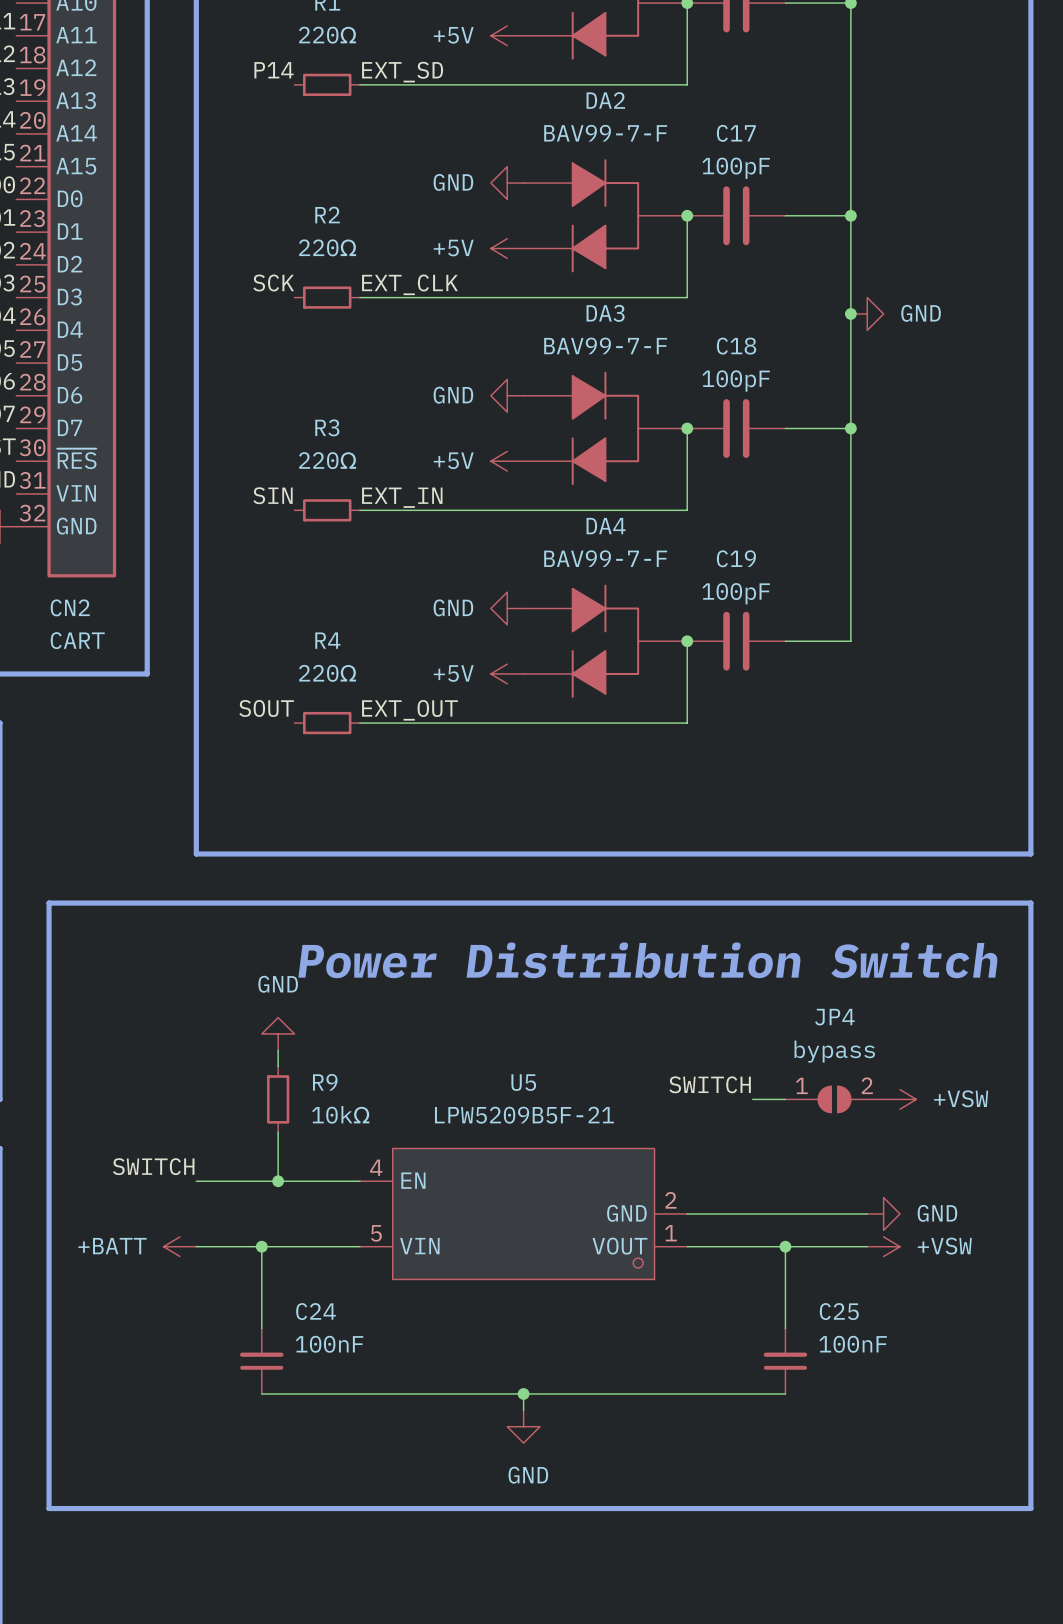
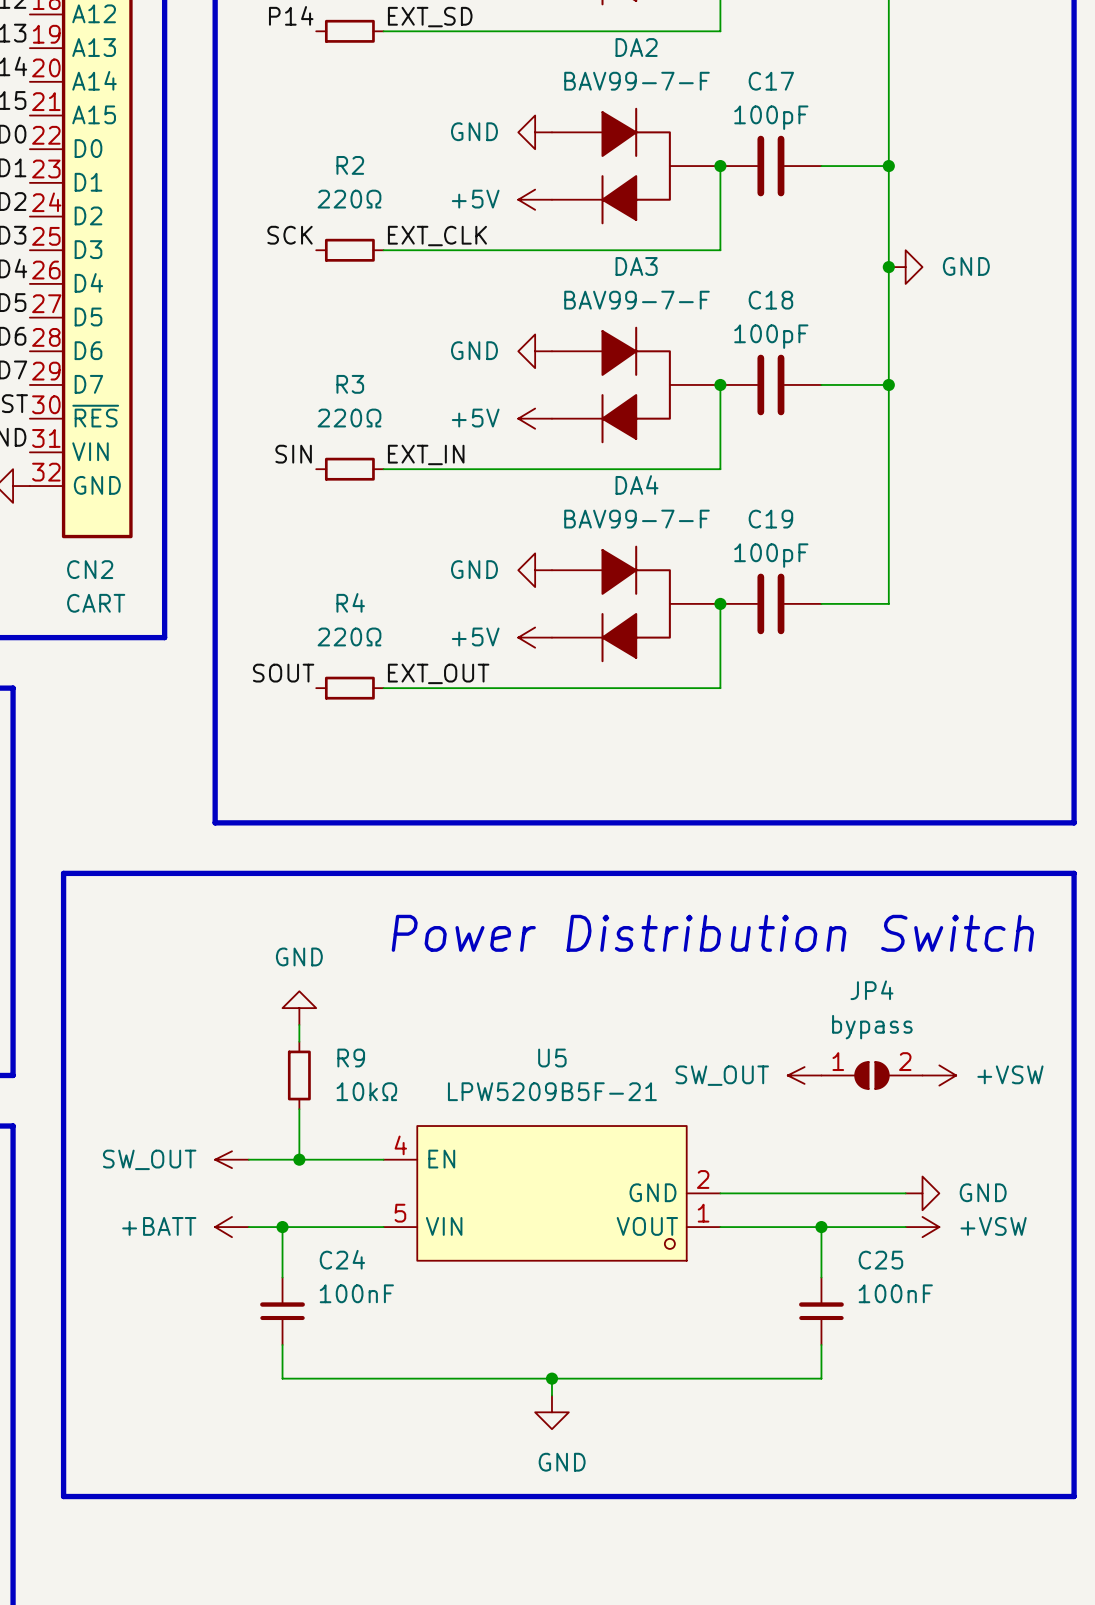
label: SWITCH (710, 1084) -> none
power symbol: none -> SW_OUT (804, 1075)
label: SWITCH (153, 1166) -> none
power symbol: none -> SW_OUT (232, 1159)
power symbol position: +BATT (179, 1246) -> +BATT (232, 1227)
C24 position: (261, 1361) -> (282, 1311)
C25 position: (785, 1361) -> (821, 1311)

